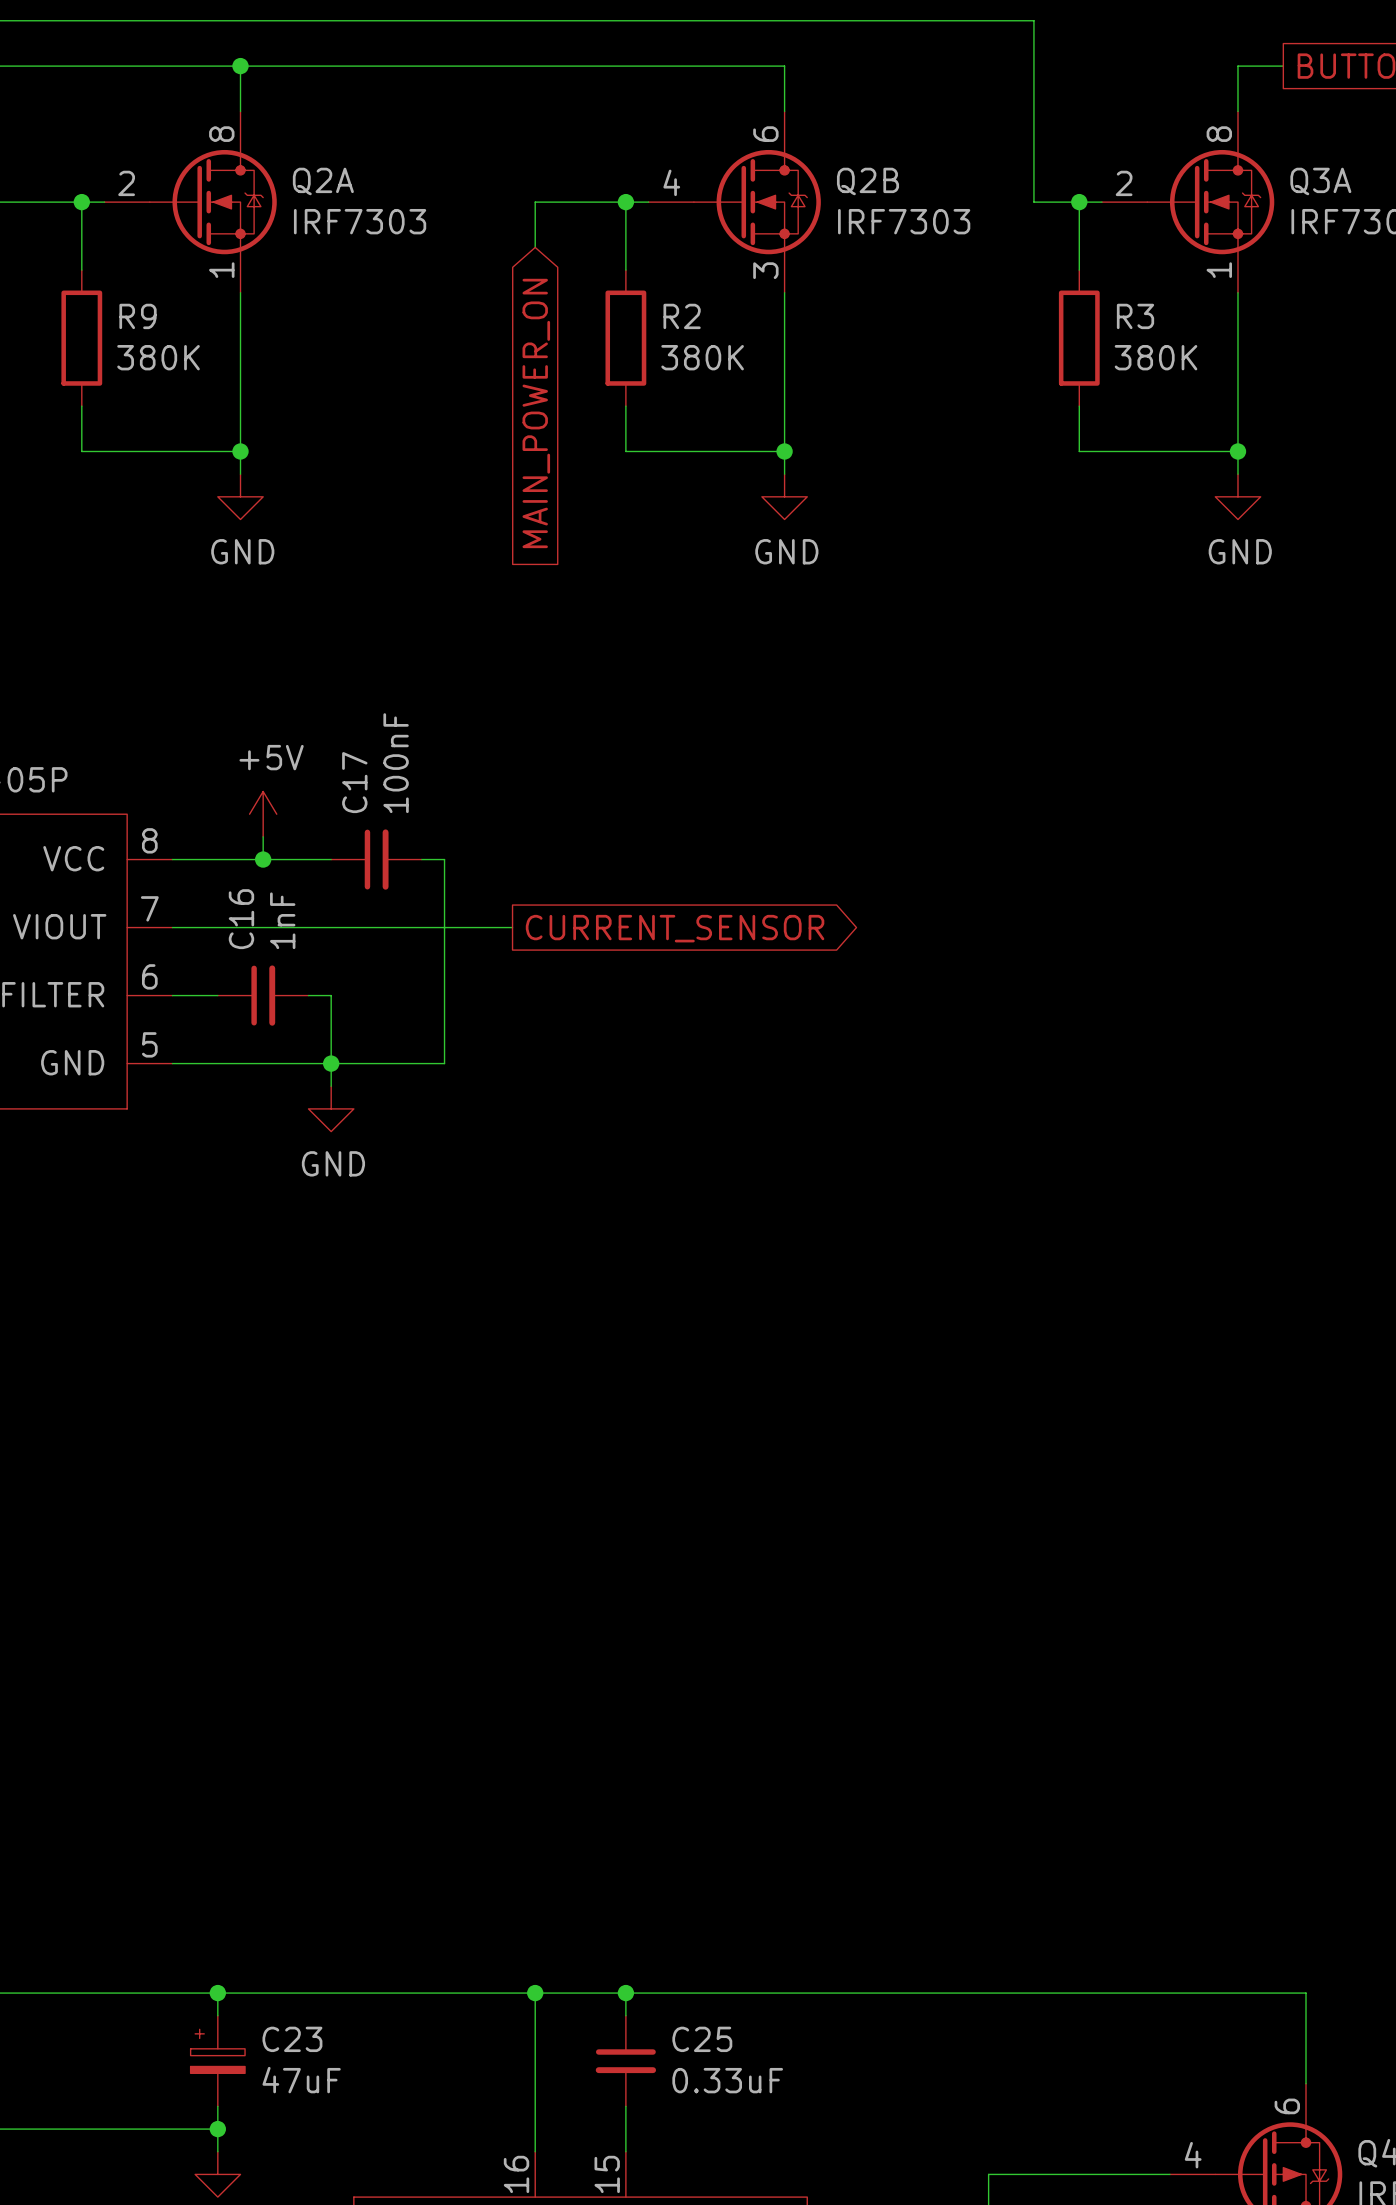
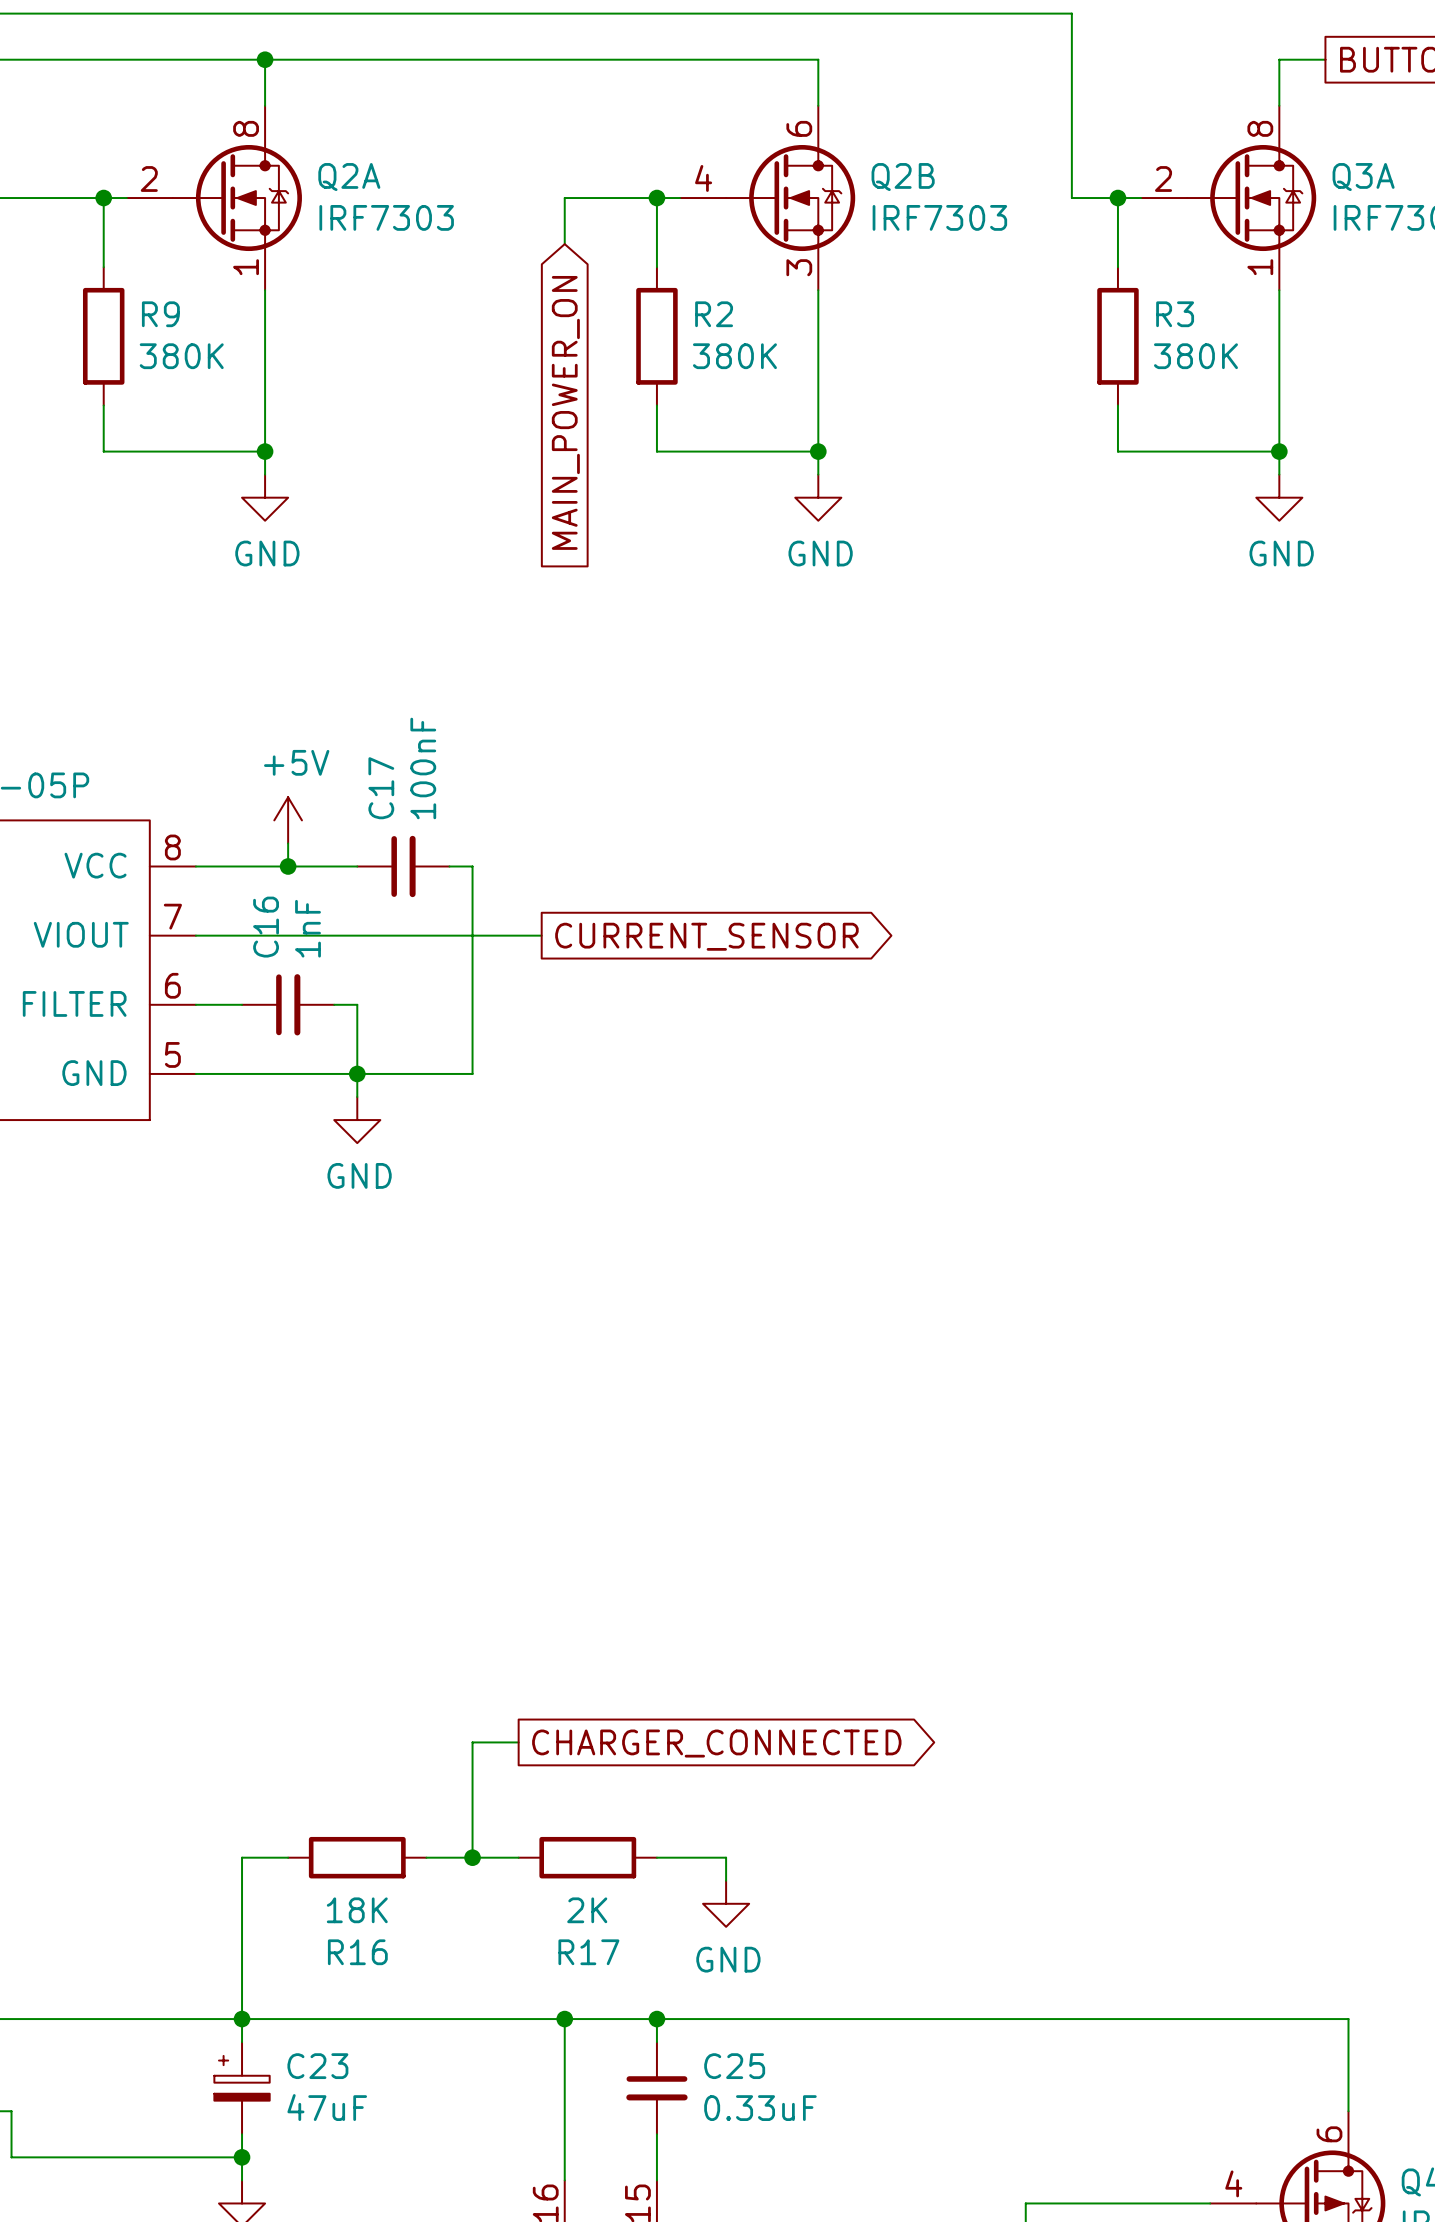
wire: none -> (518, 1742) (472, 1742) (472, 1857)
global label: none -> CHARGER_CONNECTED (716, 1743)
wire: none -> (288, 1857) (242, 1857) (242, 2019)
R16: none -> 18K (357, 1857)
wire: none -> (426, 1857) (518, 1857)
junction: none -> (472, 1857)
R17: none -> 2K (587, 1857)
wire: none -> (656, 1857) (726, 1857) (726, 1880)
power symbol: none -> GND (726, 1903)

